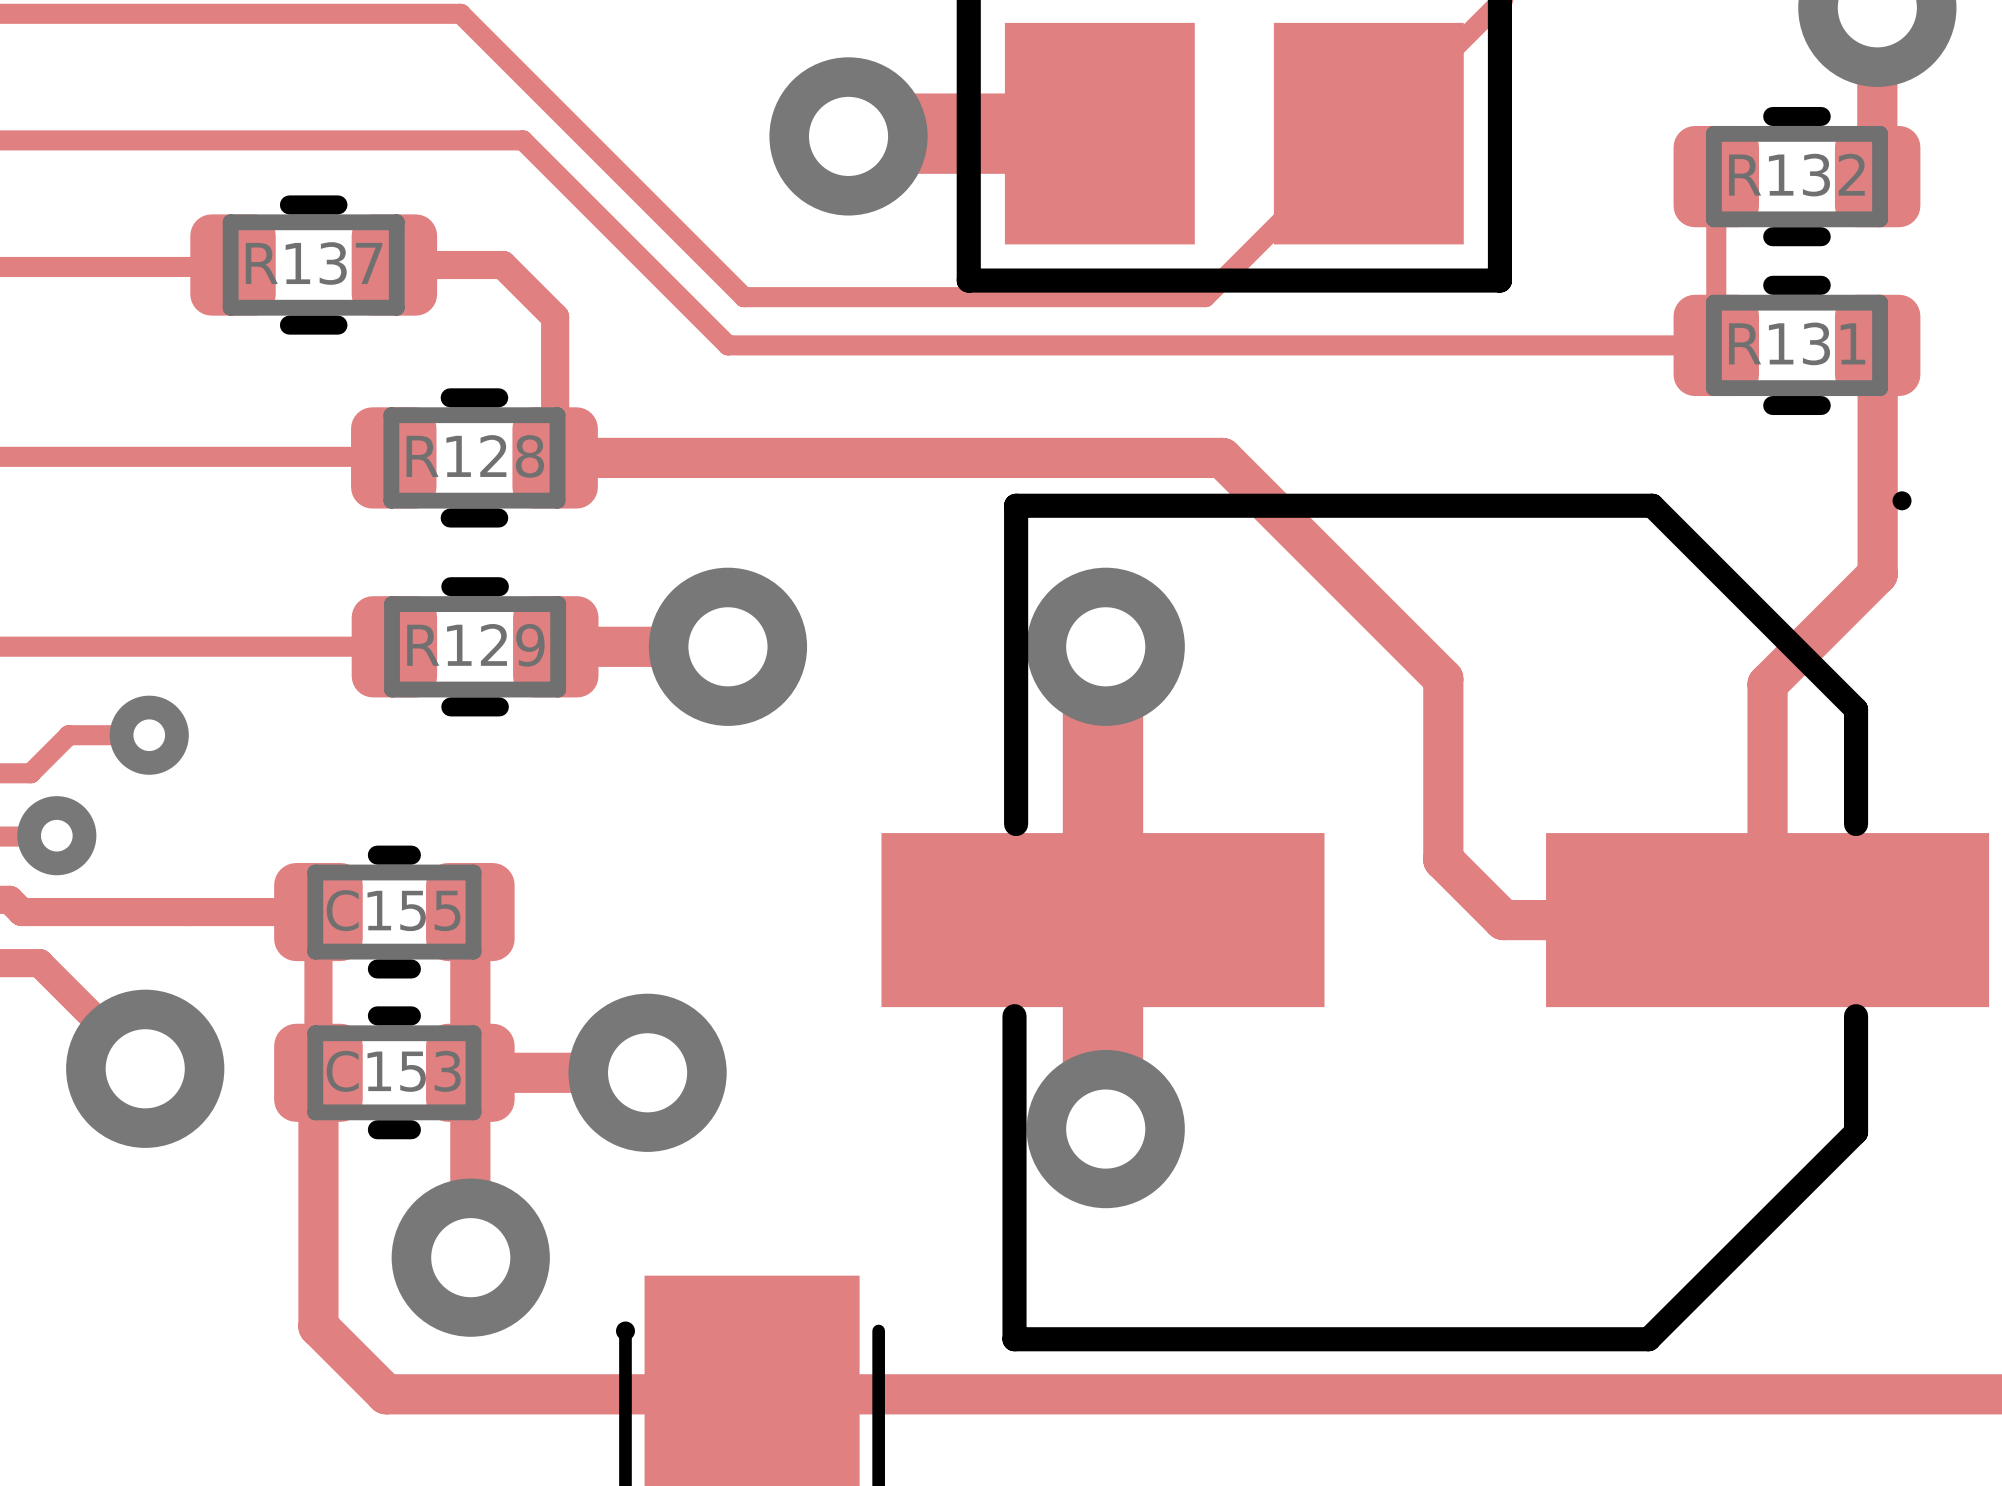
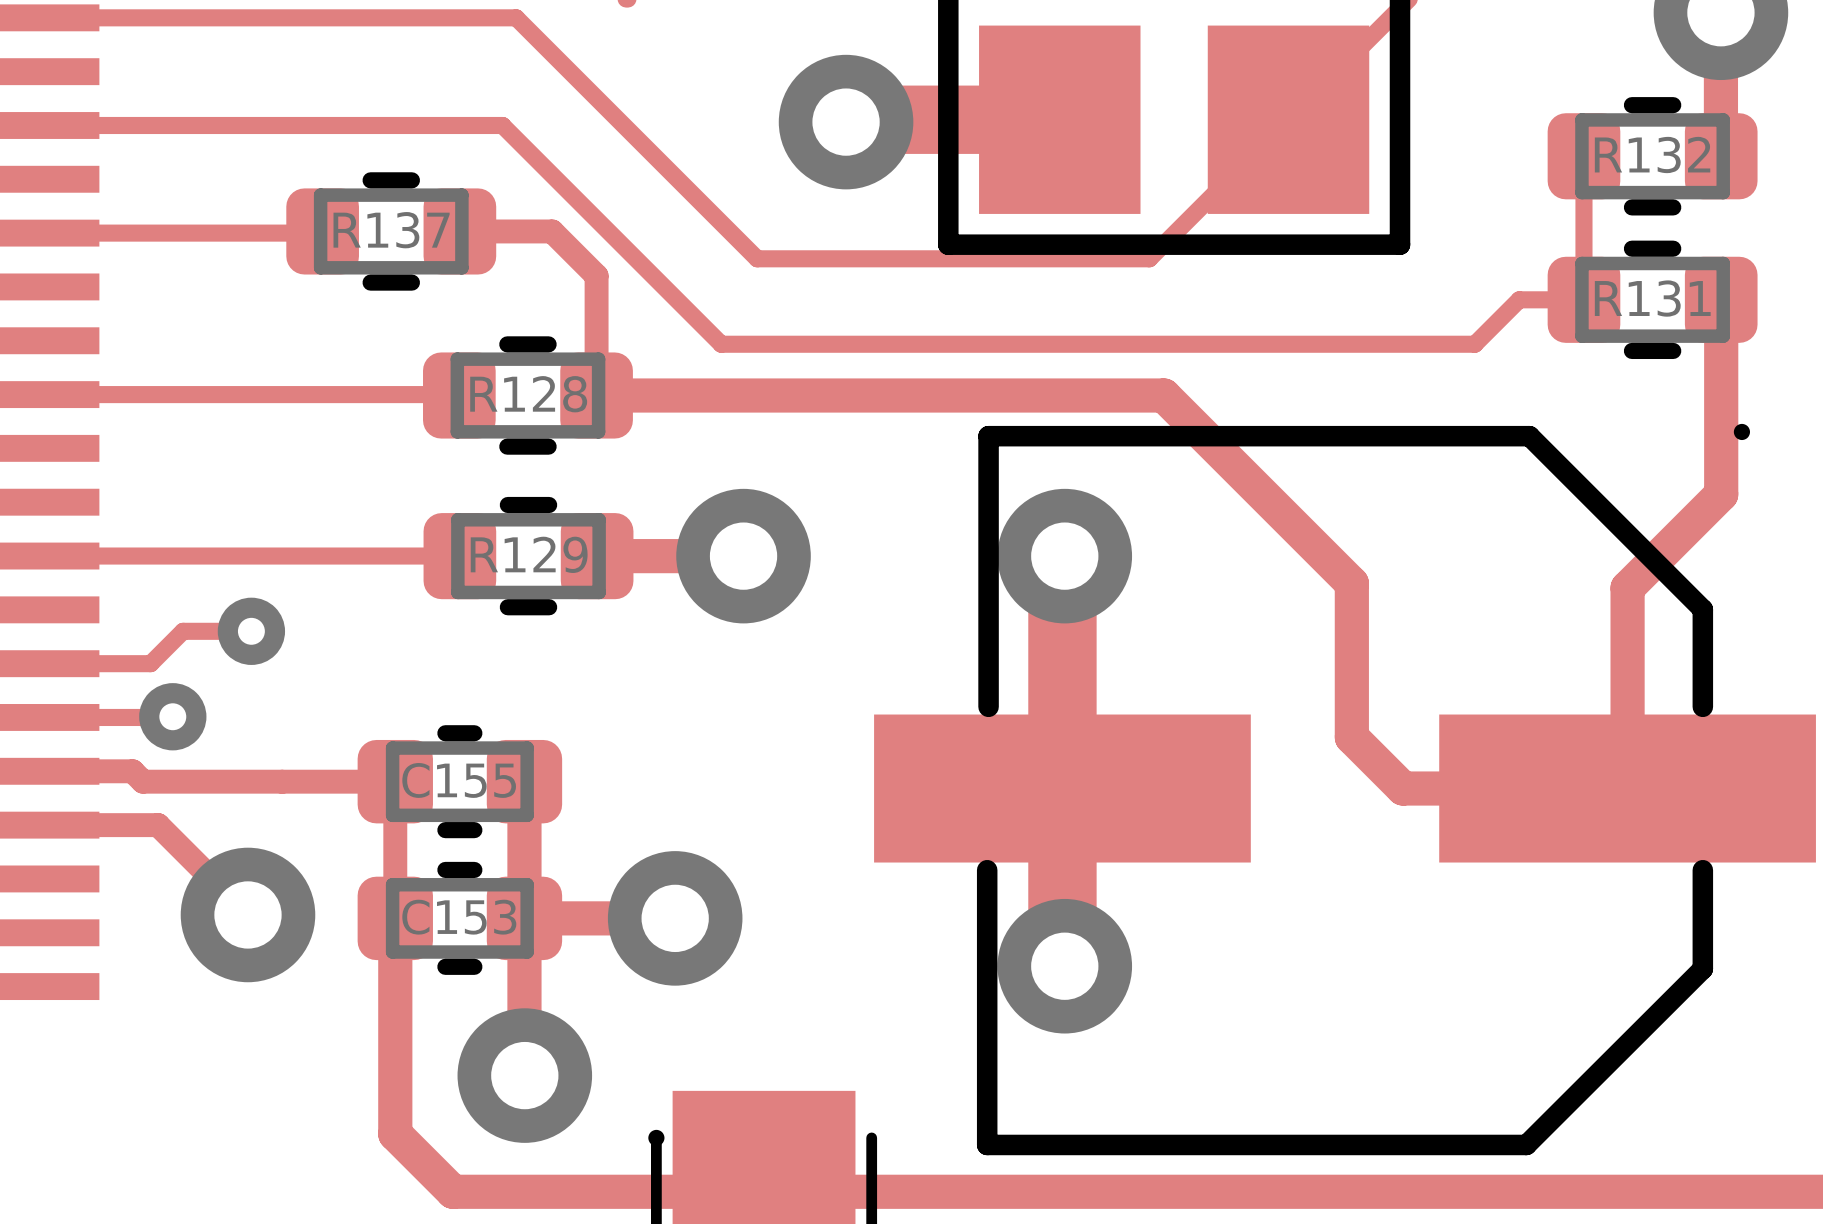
track: (444, 140) (522, 140) (727, 345) (1640, 345) -> (502, 125) (721, 344) (1474, 344) (1519, 299)

